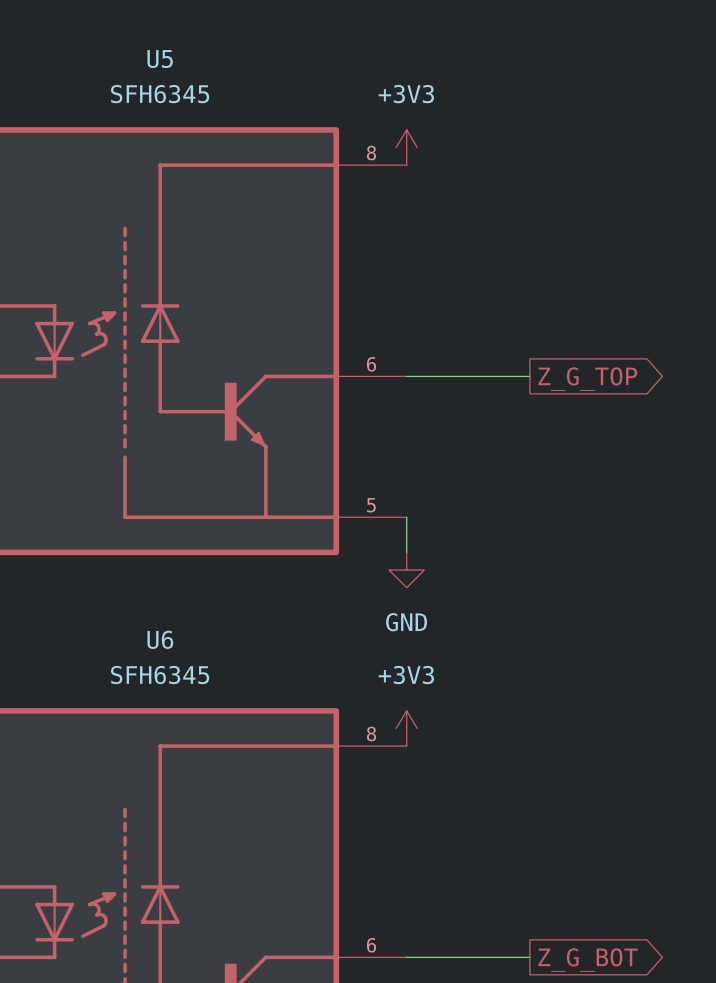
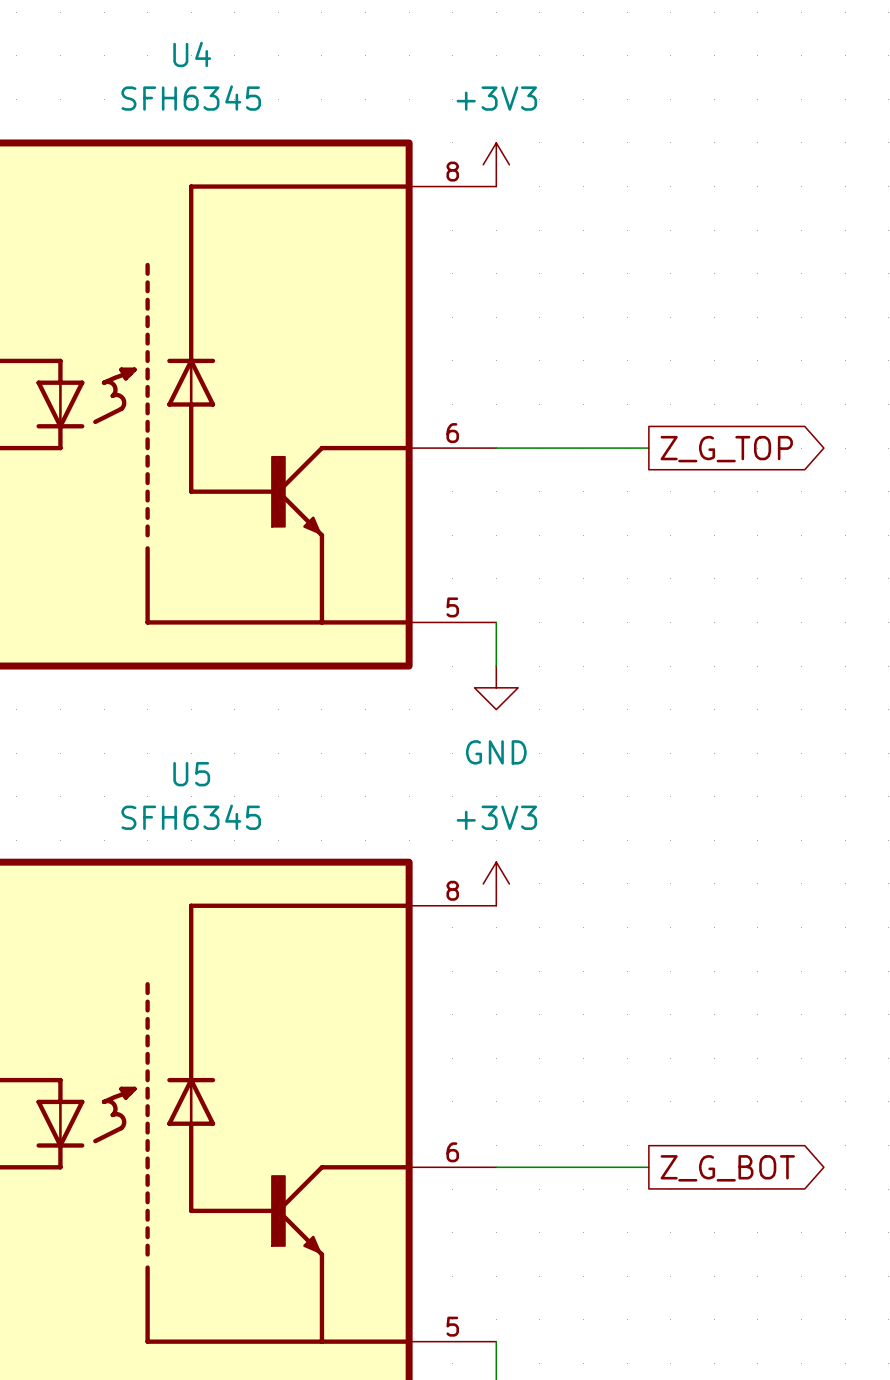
U5 name: U5 (160, 59) -> U4 (192, 54)
U6 name: U6 (160, 639) -> U5 (191, 774)

